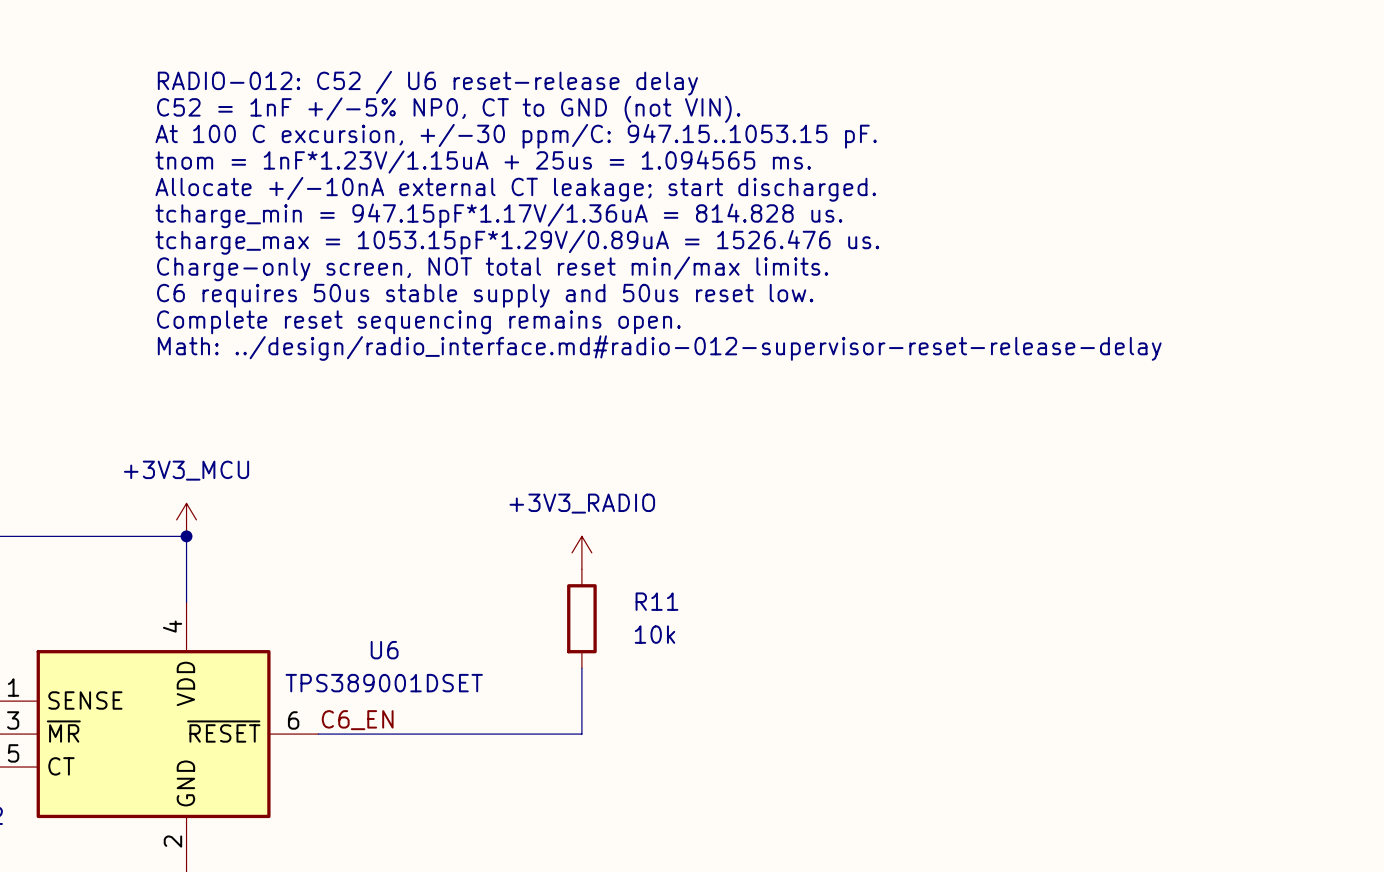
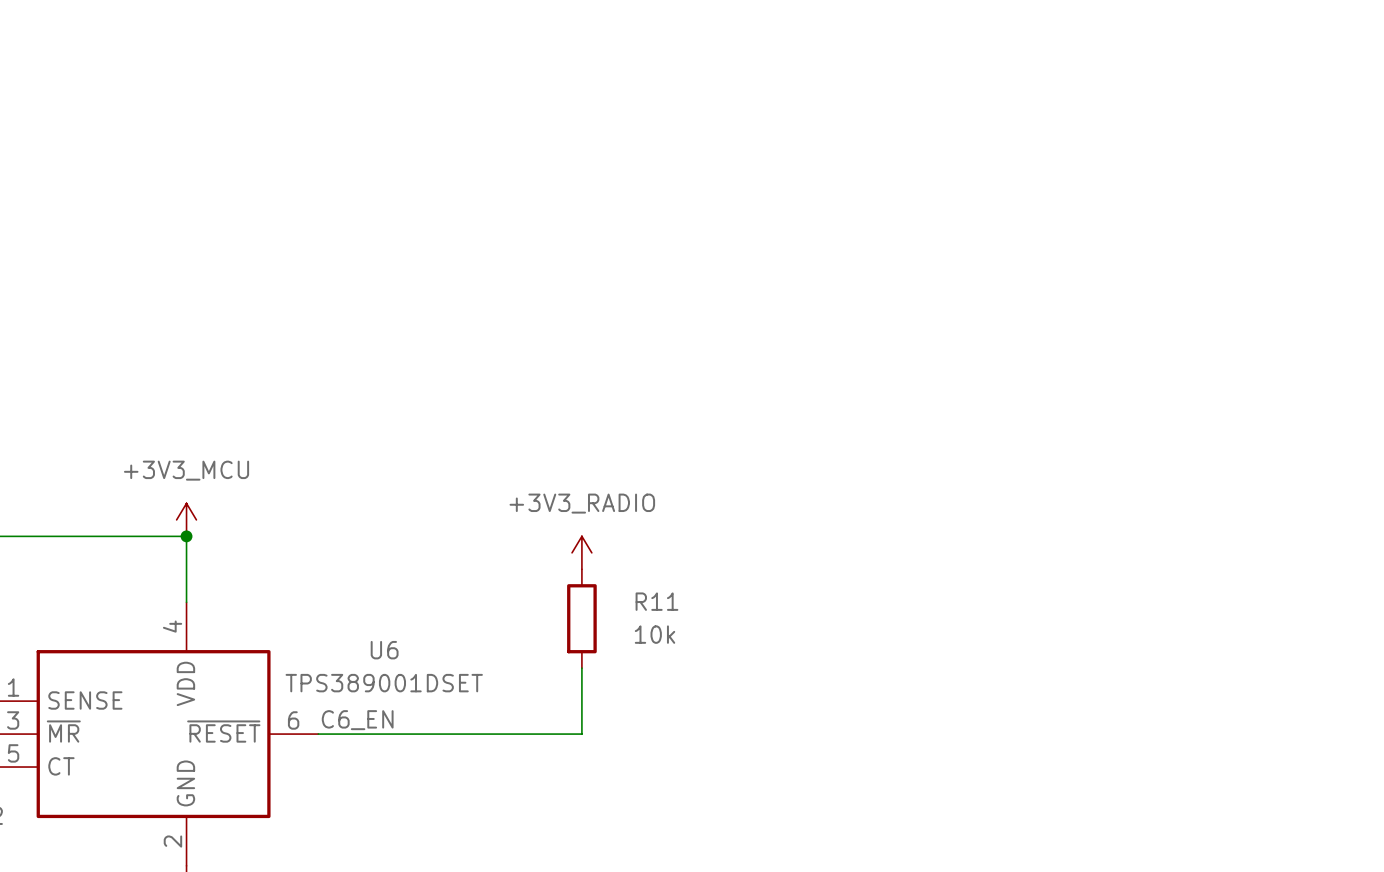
text: RADIO-012: C52 / U6 reset-release delay (427, 83) -> none
text: C52 = 1nF +/-5% NP0, CT to GND (not VIN). (448, 109) -> none
text: At 100 C excursion, +/-30 ppm/C: 947.15..1053.15 pF. (516, 136) -> none
text: tnom = 1nF*1.23V/1.15uA + 25us = 1.094565 ms. (483, 162) -> none
text: Allocate +/-10nA external CT leakage; start discharged. (515, 189) -> none
text: tcharge_min = 947.15pF*1.17V/1.36uA = 814.828 us. (498, 215) -> none
text: tcharge_max = 1053.15pF*1.29V/0.89uA = 1526.476 us. (517, 242) -> none
text: Charge-only screen, NOT total reset min/max limits. (492, 268) -> none
text: C6 requires 50us stable supply and 50us reset low. (485, 295) -> none
text: Complete reset sequencing remains open. (418, 322) -> none
text: Math: ../design/radio_interface.md#radio-012-supervisor-reset-release-delay (659, 348) -> none

